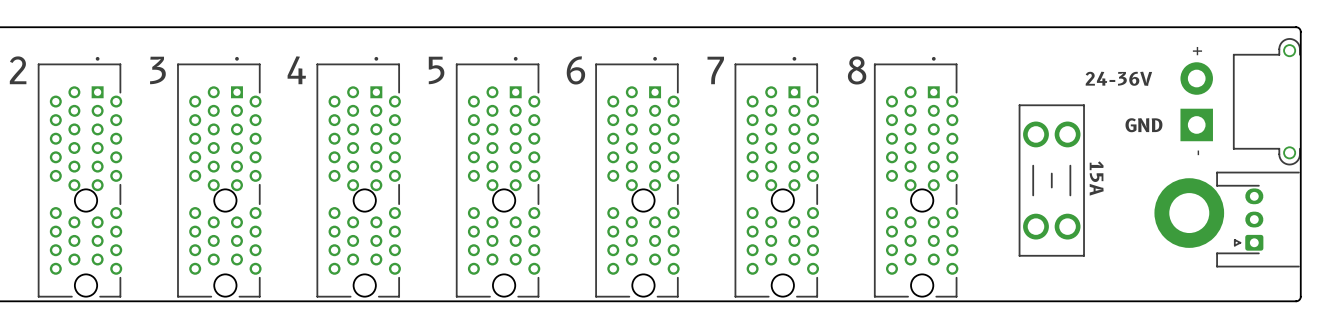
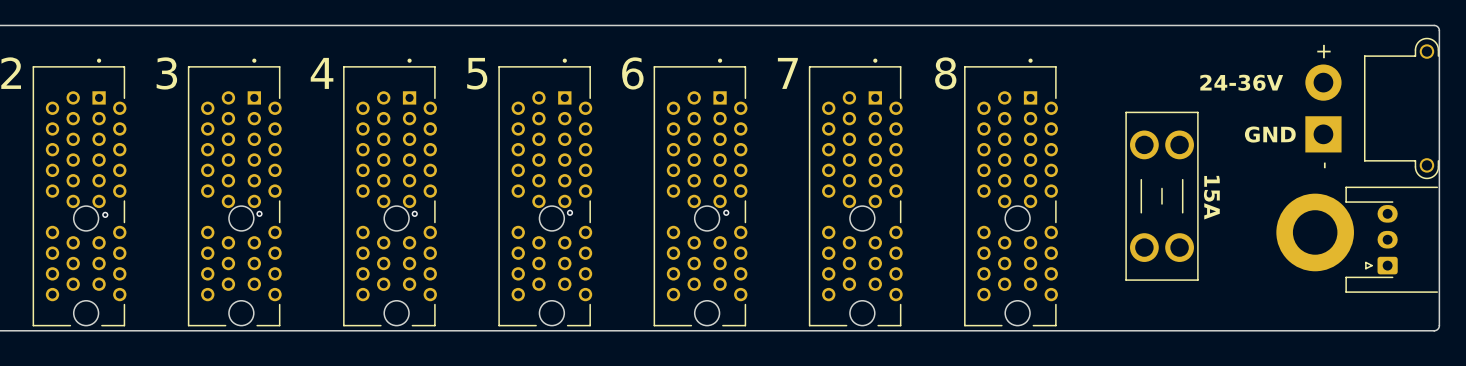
via: none -> (569, 212)
via: none -> (726, 212)
via: none -> (259, 213)
via: none -> (414, 213)
via: none -> (105, 214)

